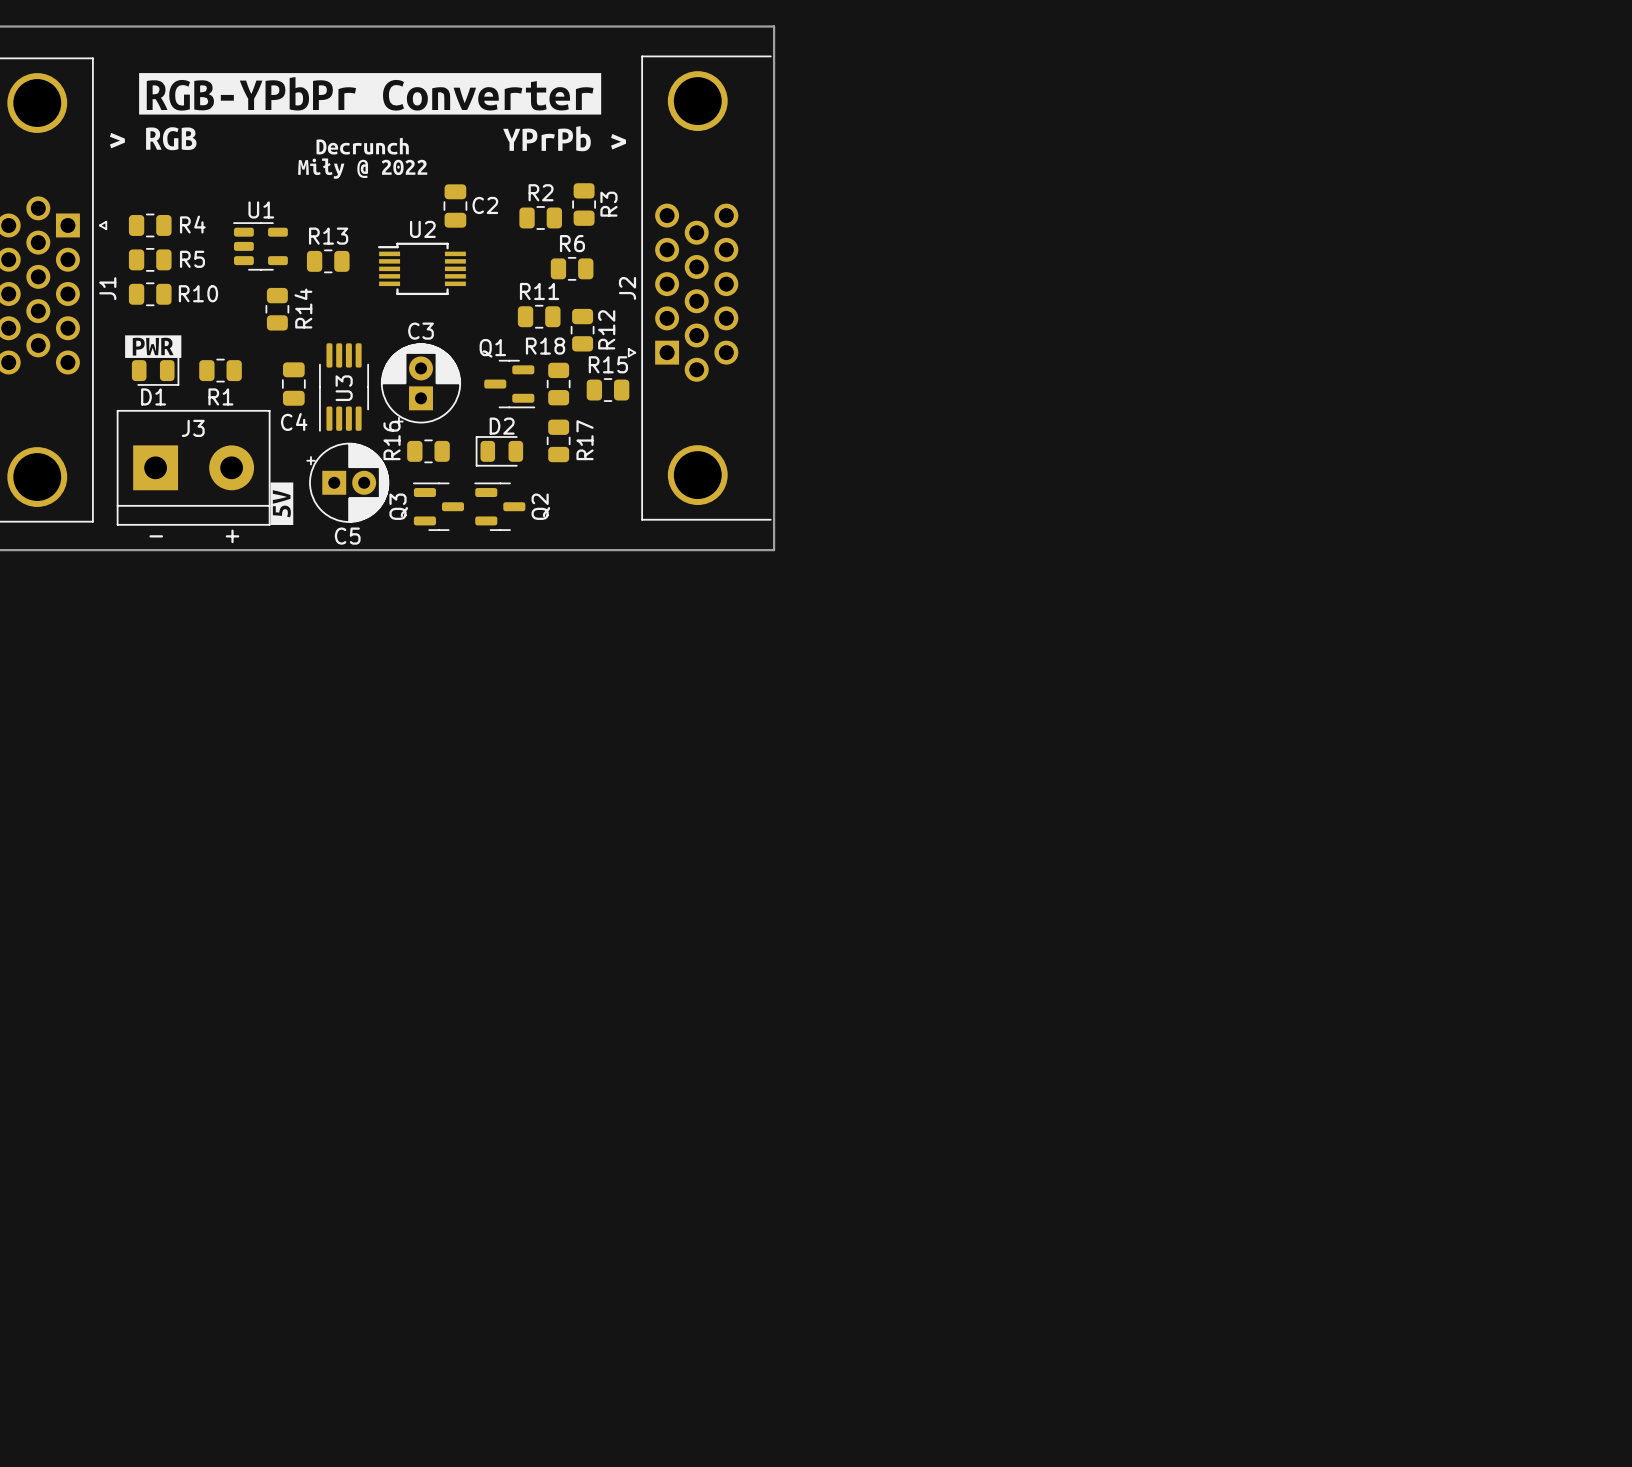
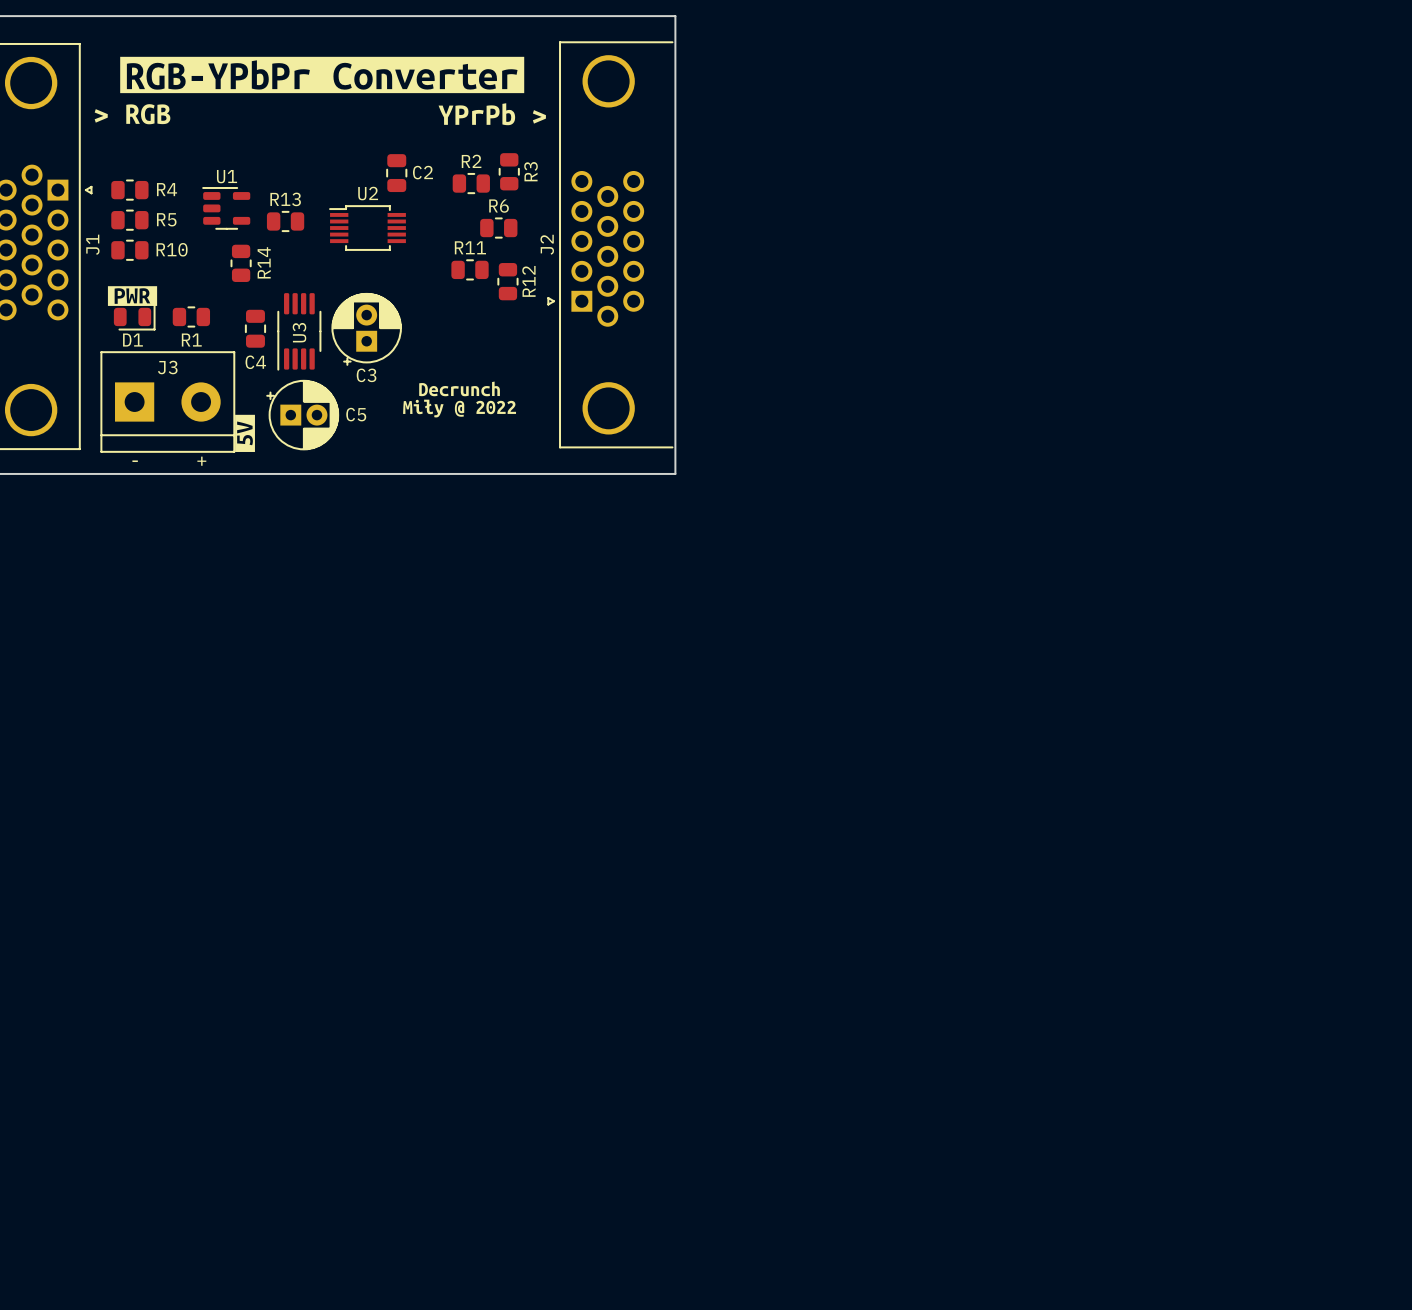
drawing position: (362, 146) -> (459, 388)
drawing position: (362, 168) -> (459, 408)
C3 name position: C3 (421, 331) -> C3 (366, 375)
Q1: (509, 384) -> none
R18: (558, 384) -> none
R15: (608, 390) -> none
R17: (558, 440) -> none
R16: (428, 451) -> none
D2: (499, 451) -> none
Q3: (438, 506) -> none
Q2: (499, 506) -> none
C5 name position: C5 (347, 536) -> C5 (356, 414)

